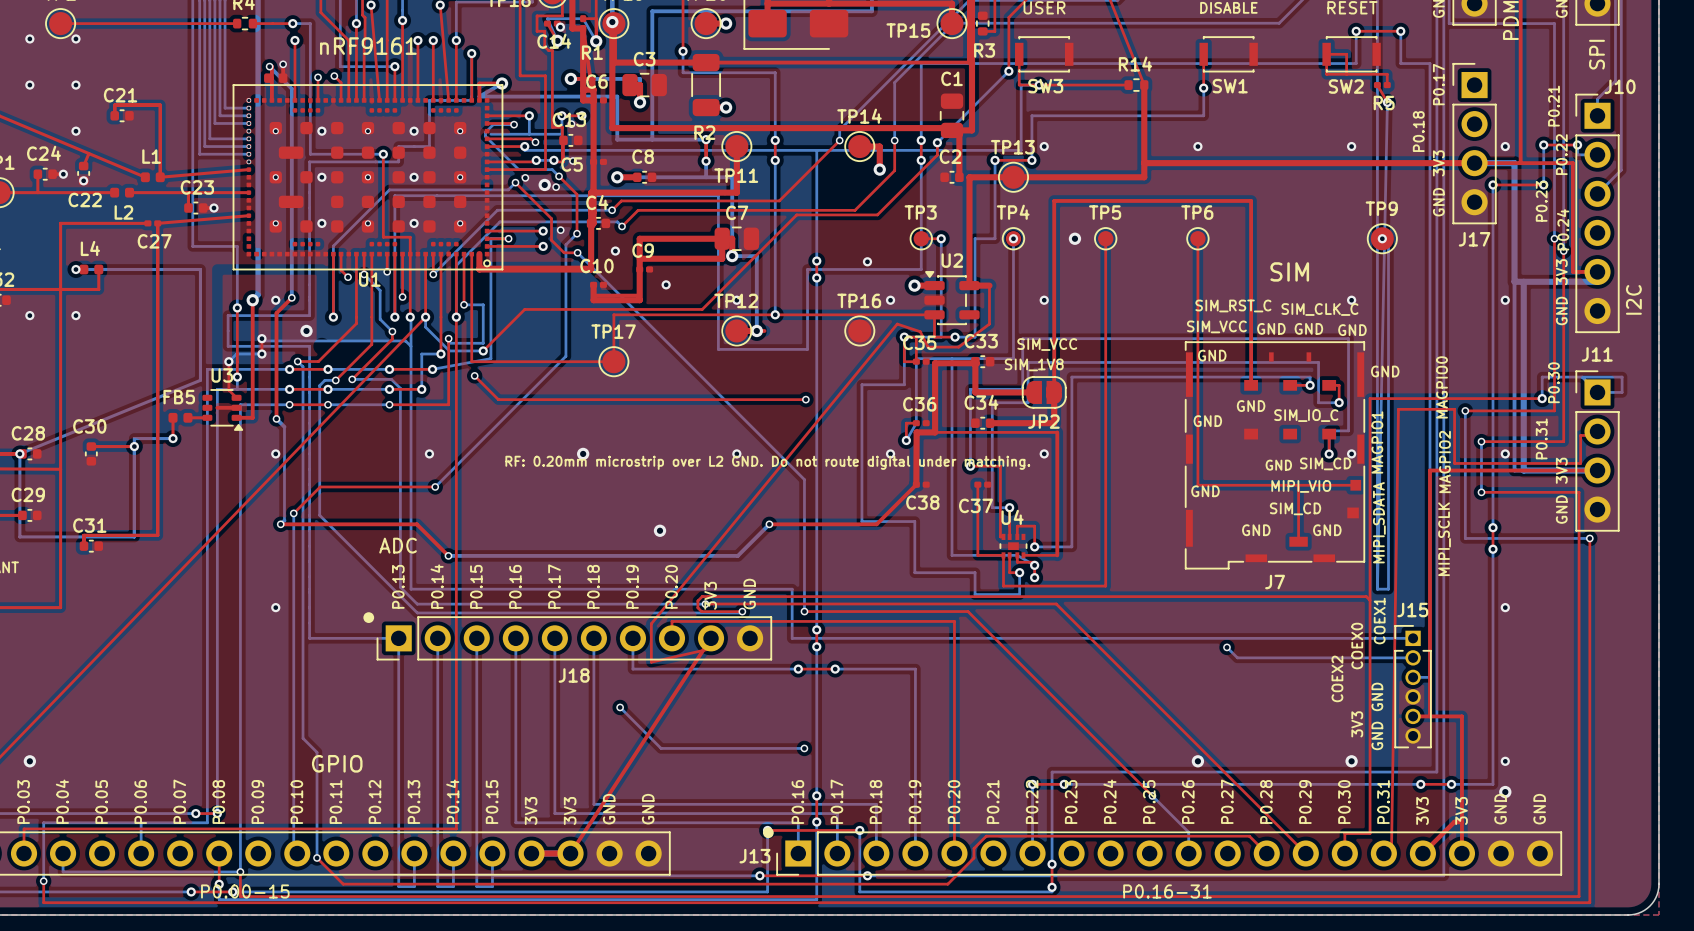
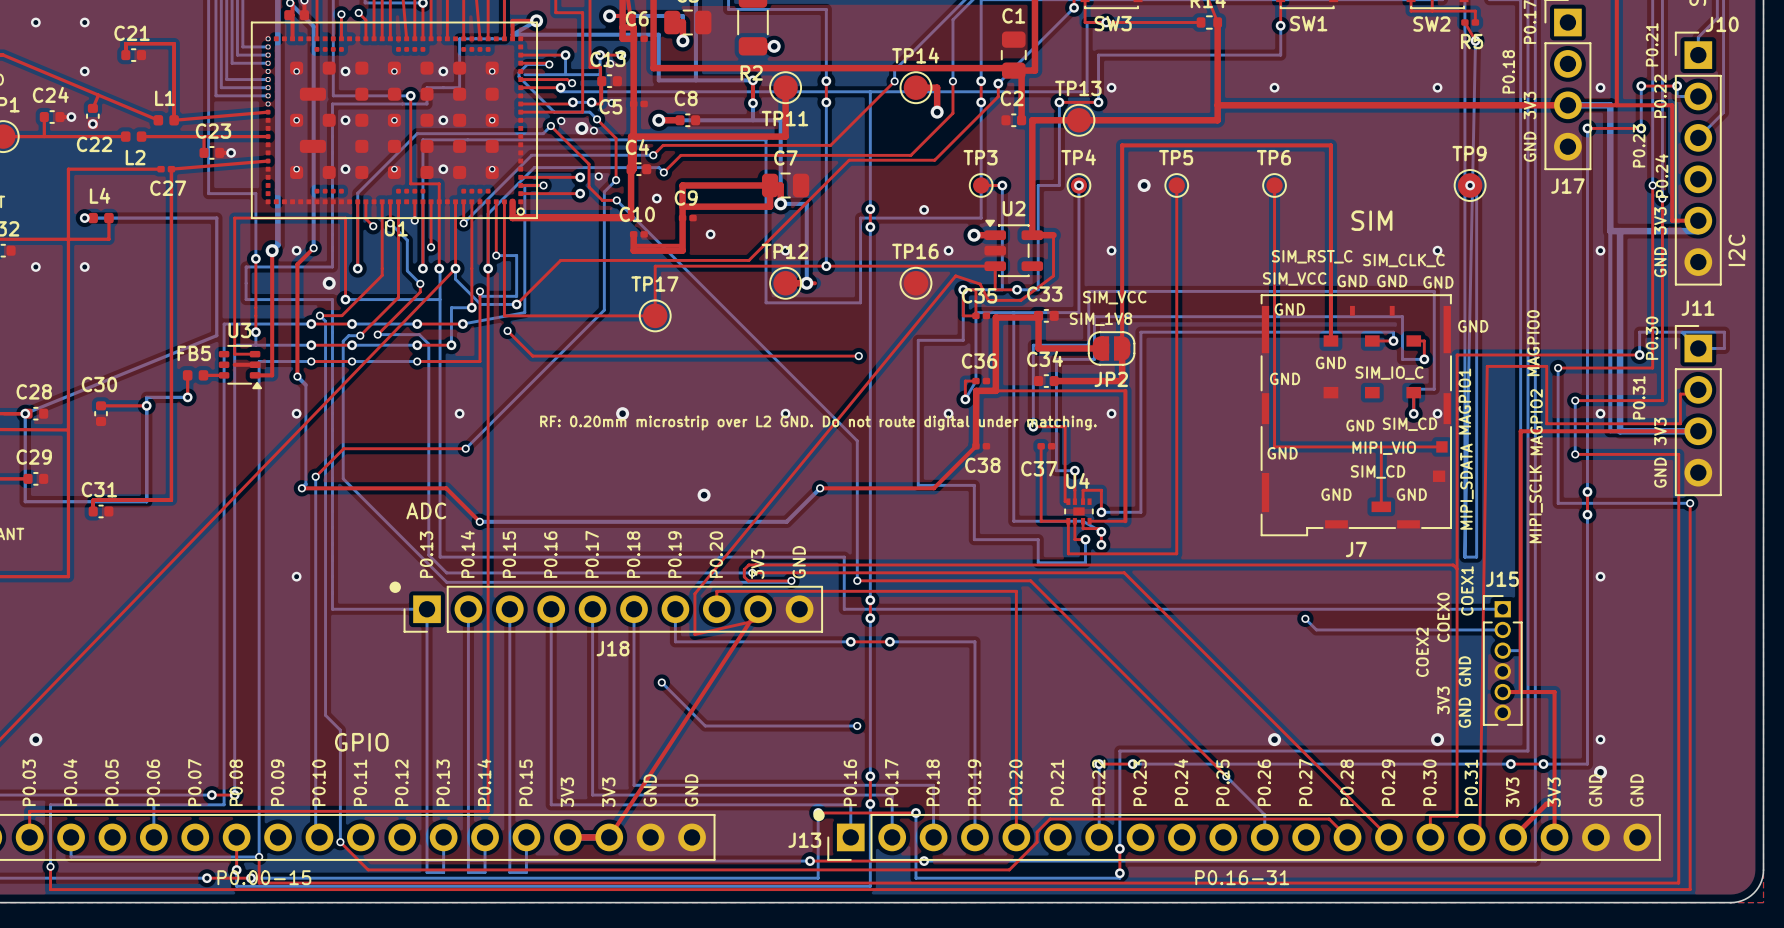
top track: (261, 338) (261, 354) -> none
bottom track: (261, 338) (264, 340) (405, 340) (411, 346) -> (345, 299) (440, 299)
via: (261, 338) -> none
via: none -> (345, 299)
bottom track: (261, 354) (236, 354) (228, 361) -> none
via: (261, 354) -> none
top track: (228, 361) (228, 390) (236, 397) -> (345, 299) (345, 218) (234, 218) (234, 354) (255, 354)
via: (228, 361) -> none

